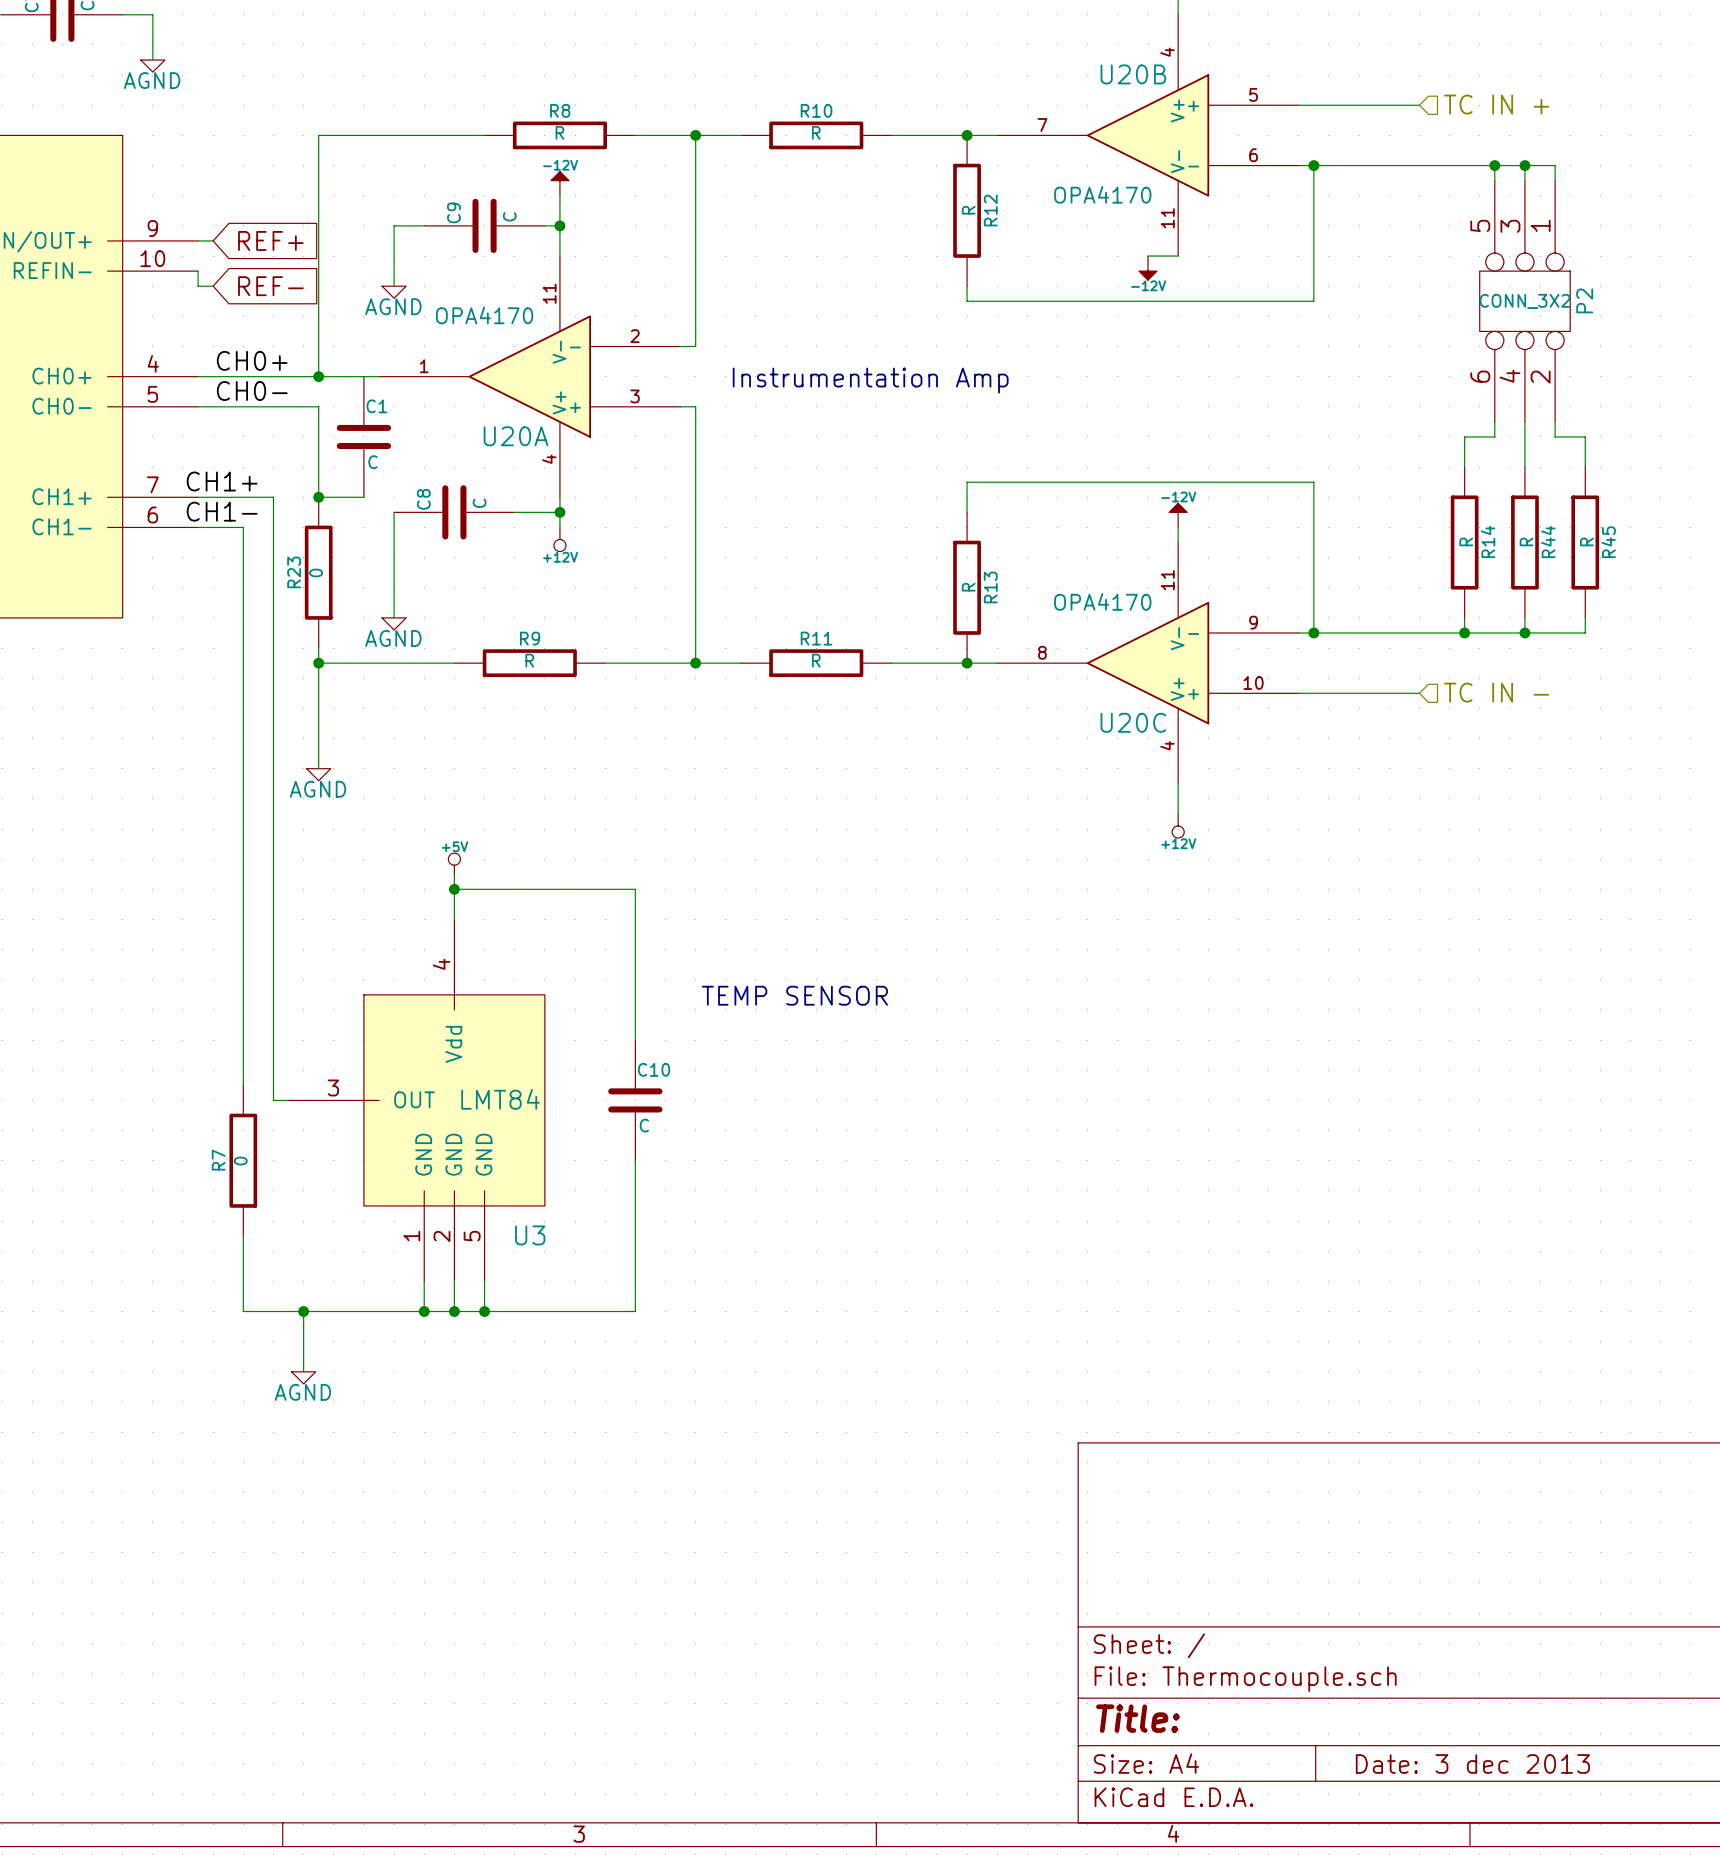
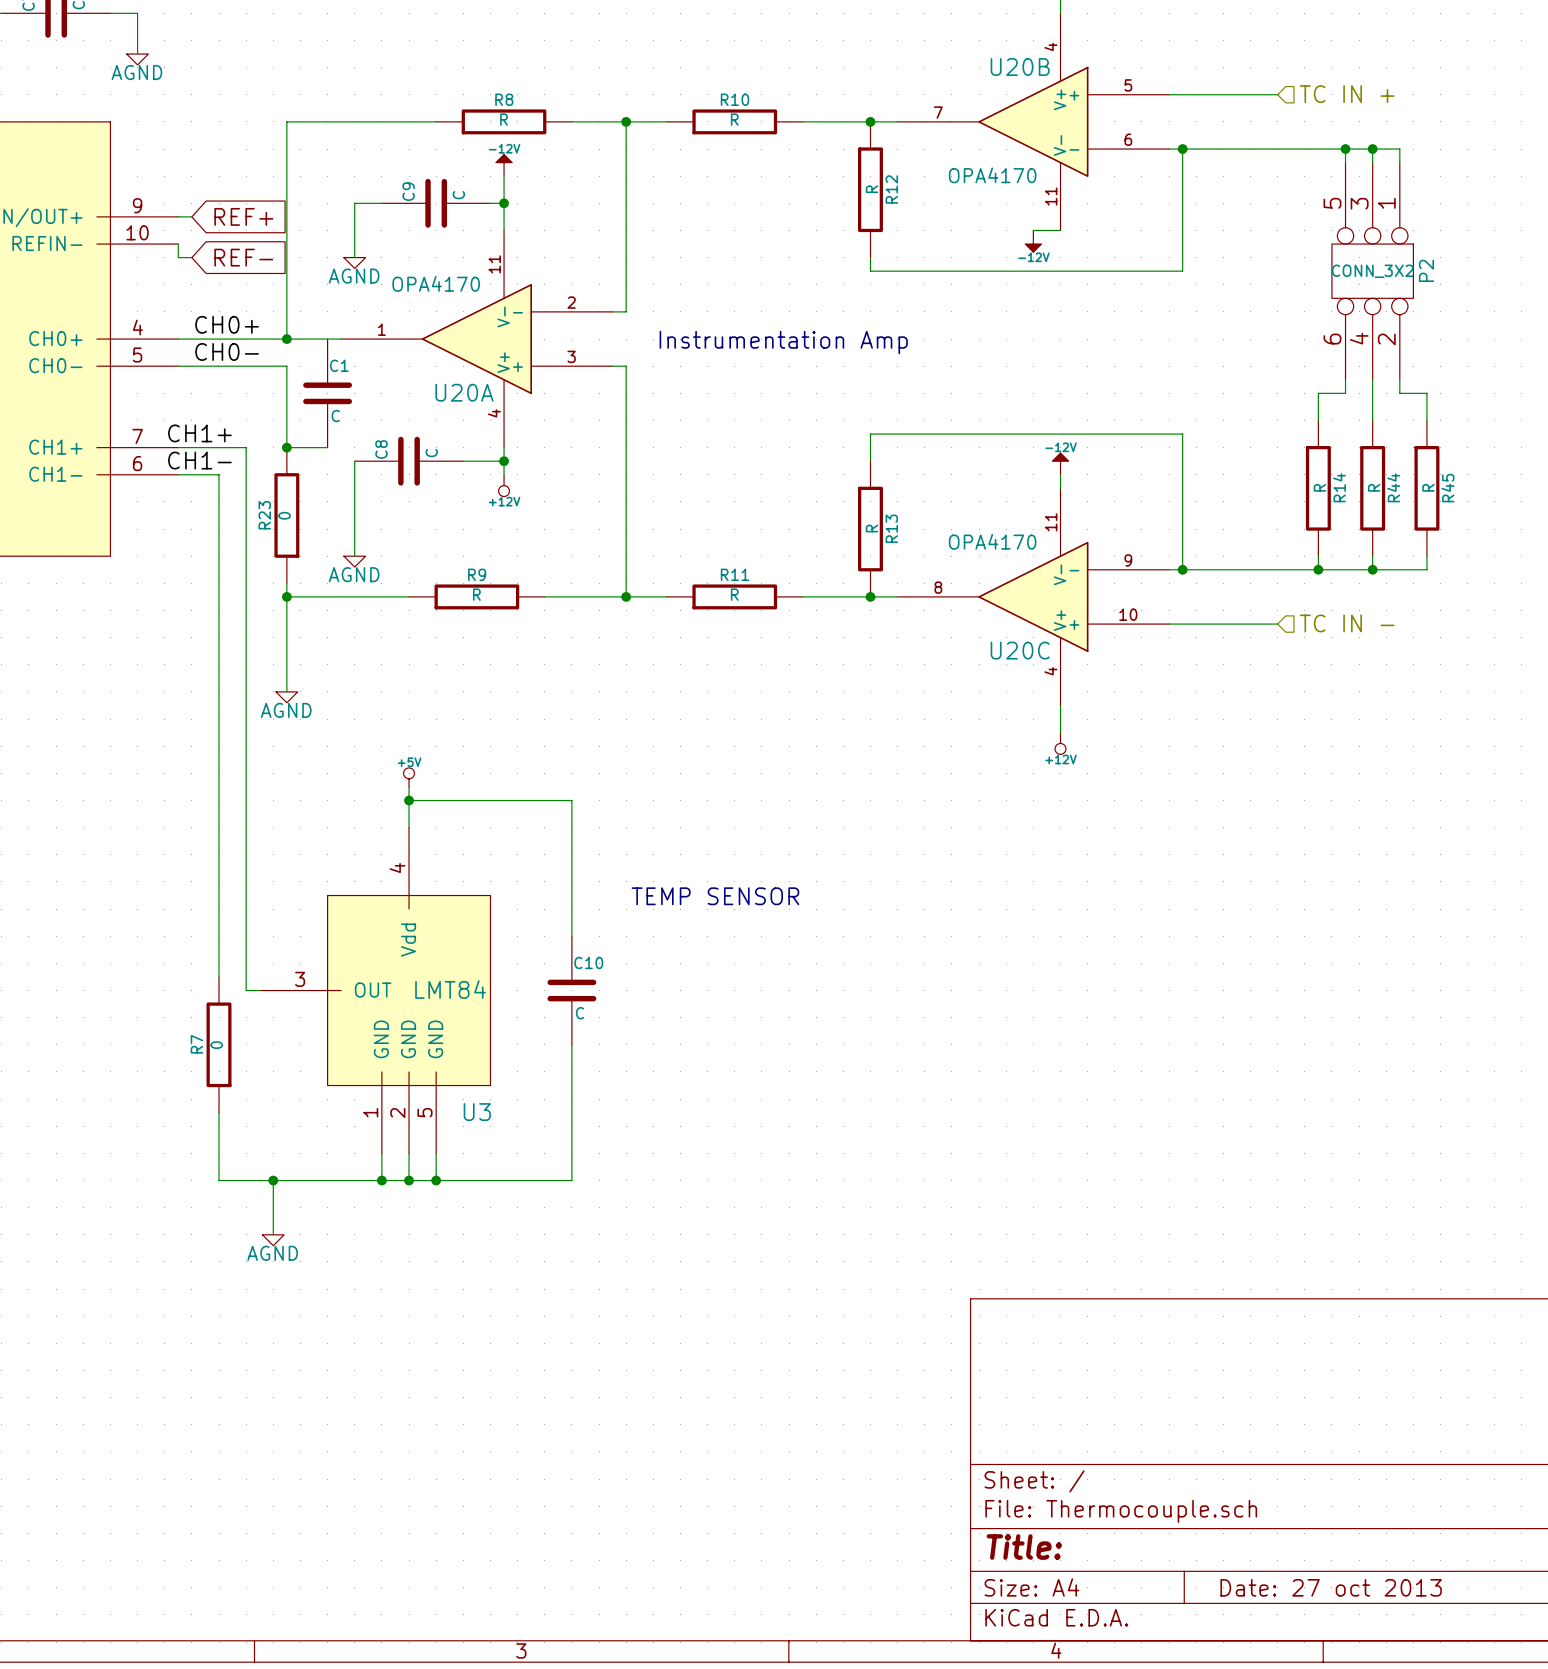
title block: Date: 3 dec 2013 (1472, 1763) -> Date: 27 oct 2013 (1331, 1587)

